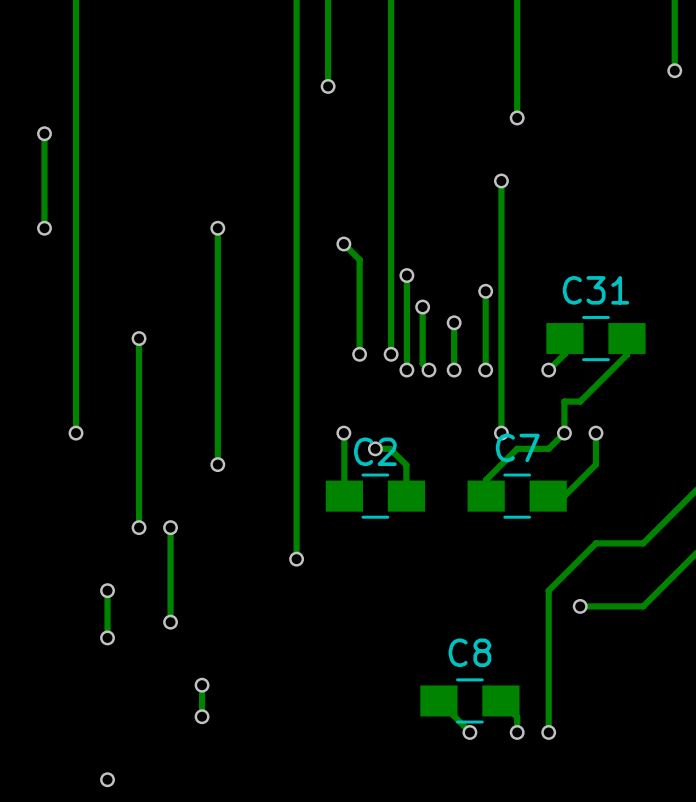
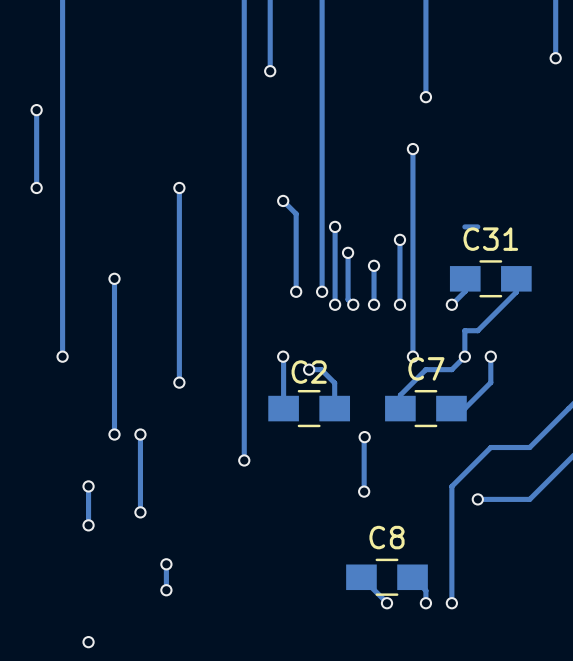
track: none -> (477, 226) (464, 226)
track: none -> (364, 437) (364, 491)
via: none -> (364, 437)
via: none -> (364, 491)

